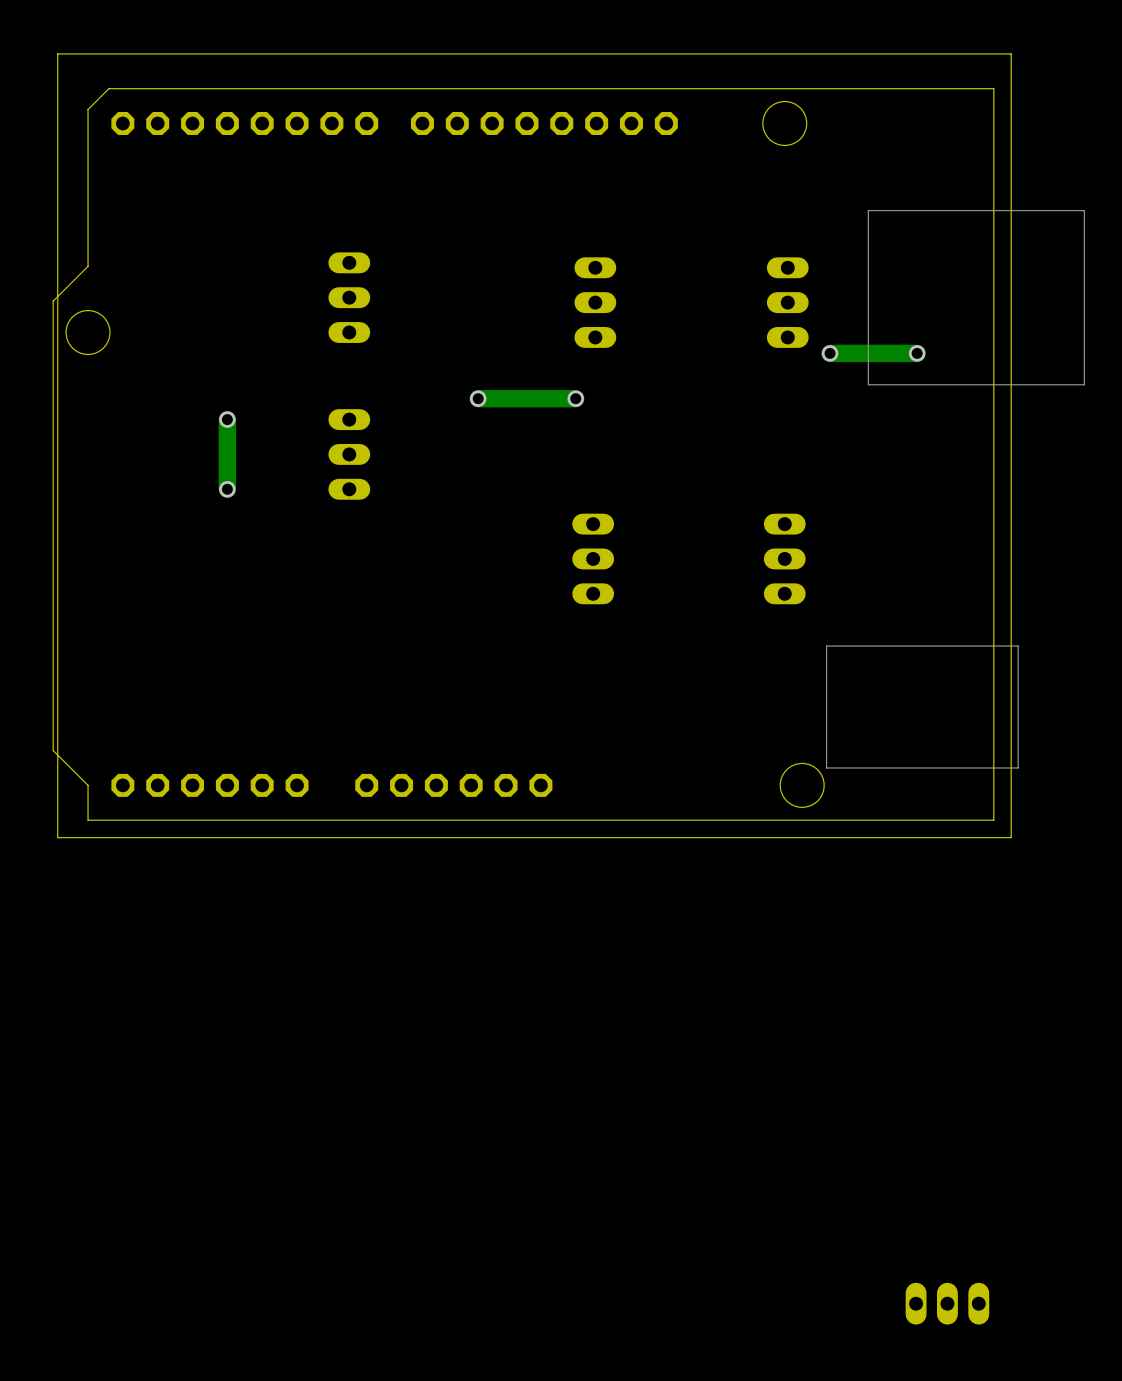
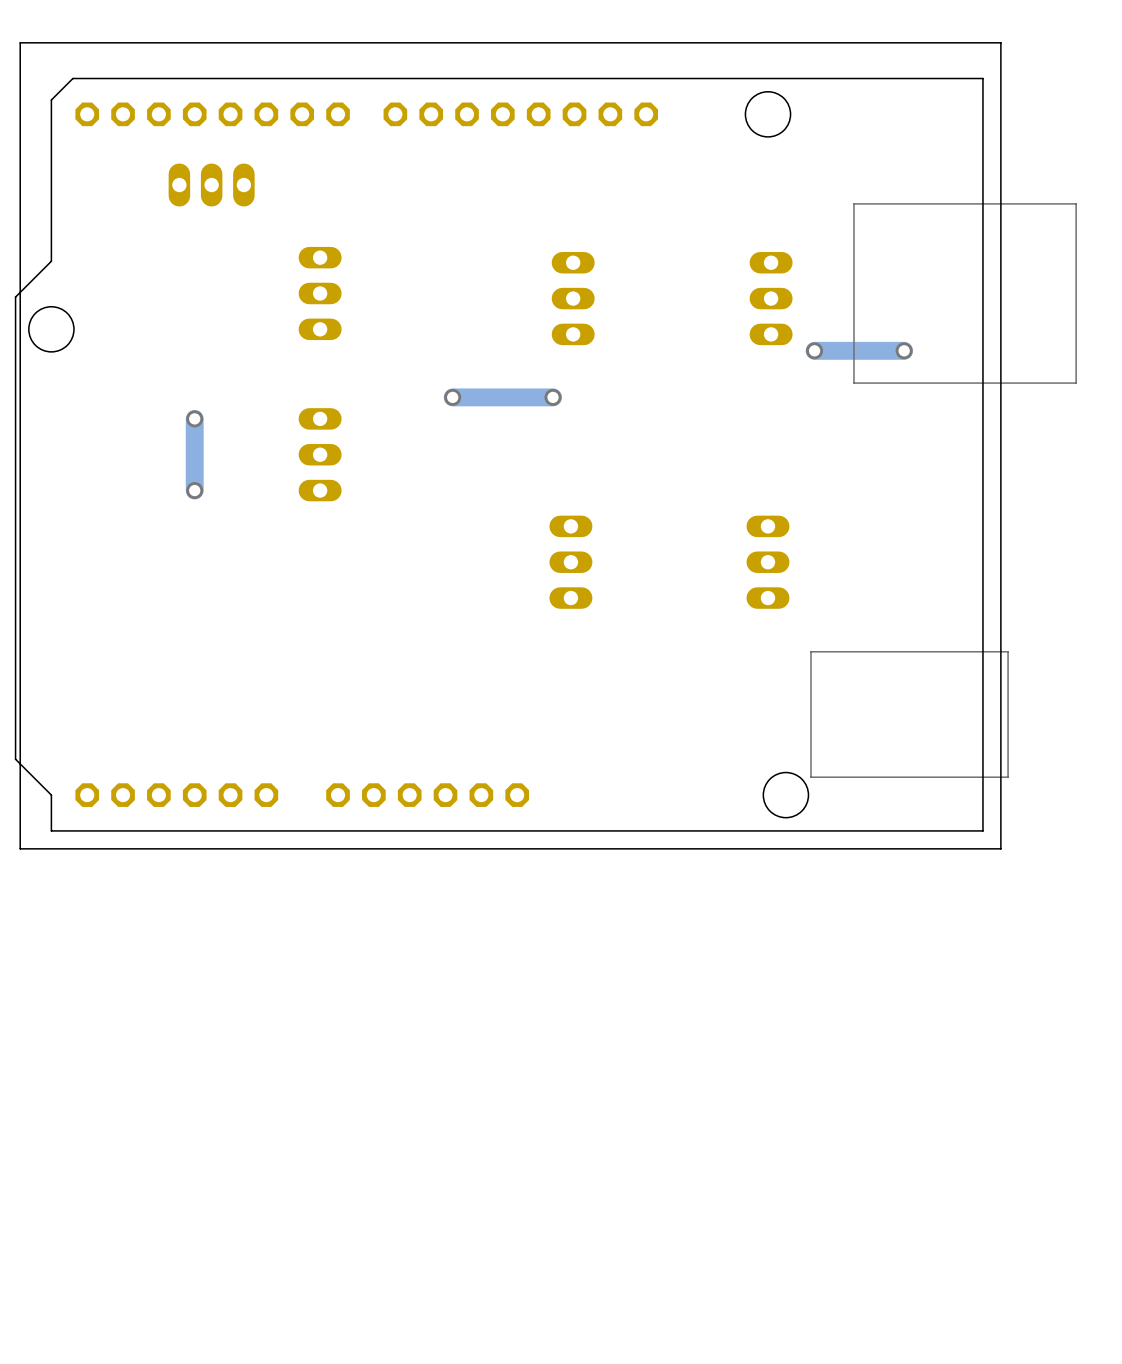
part: none -> (211, 185)
part: (947, 1303) -> none

